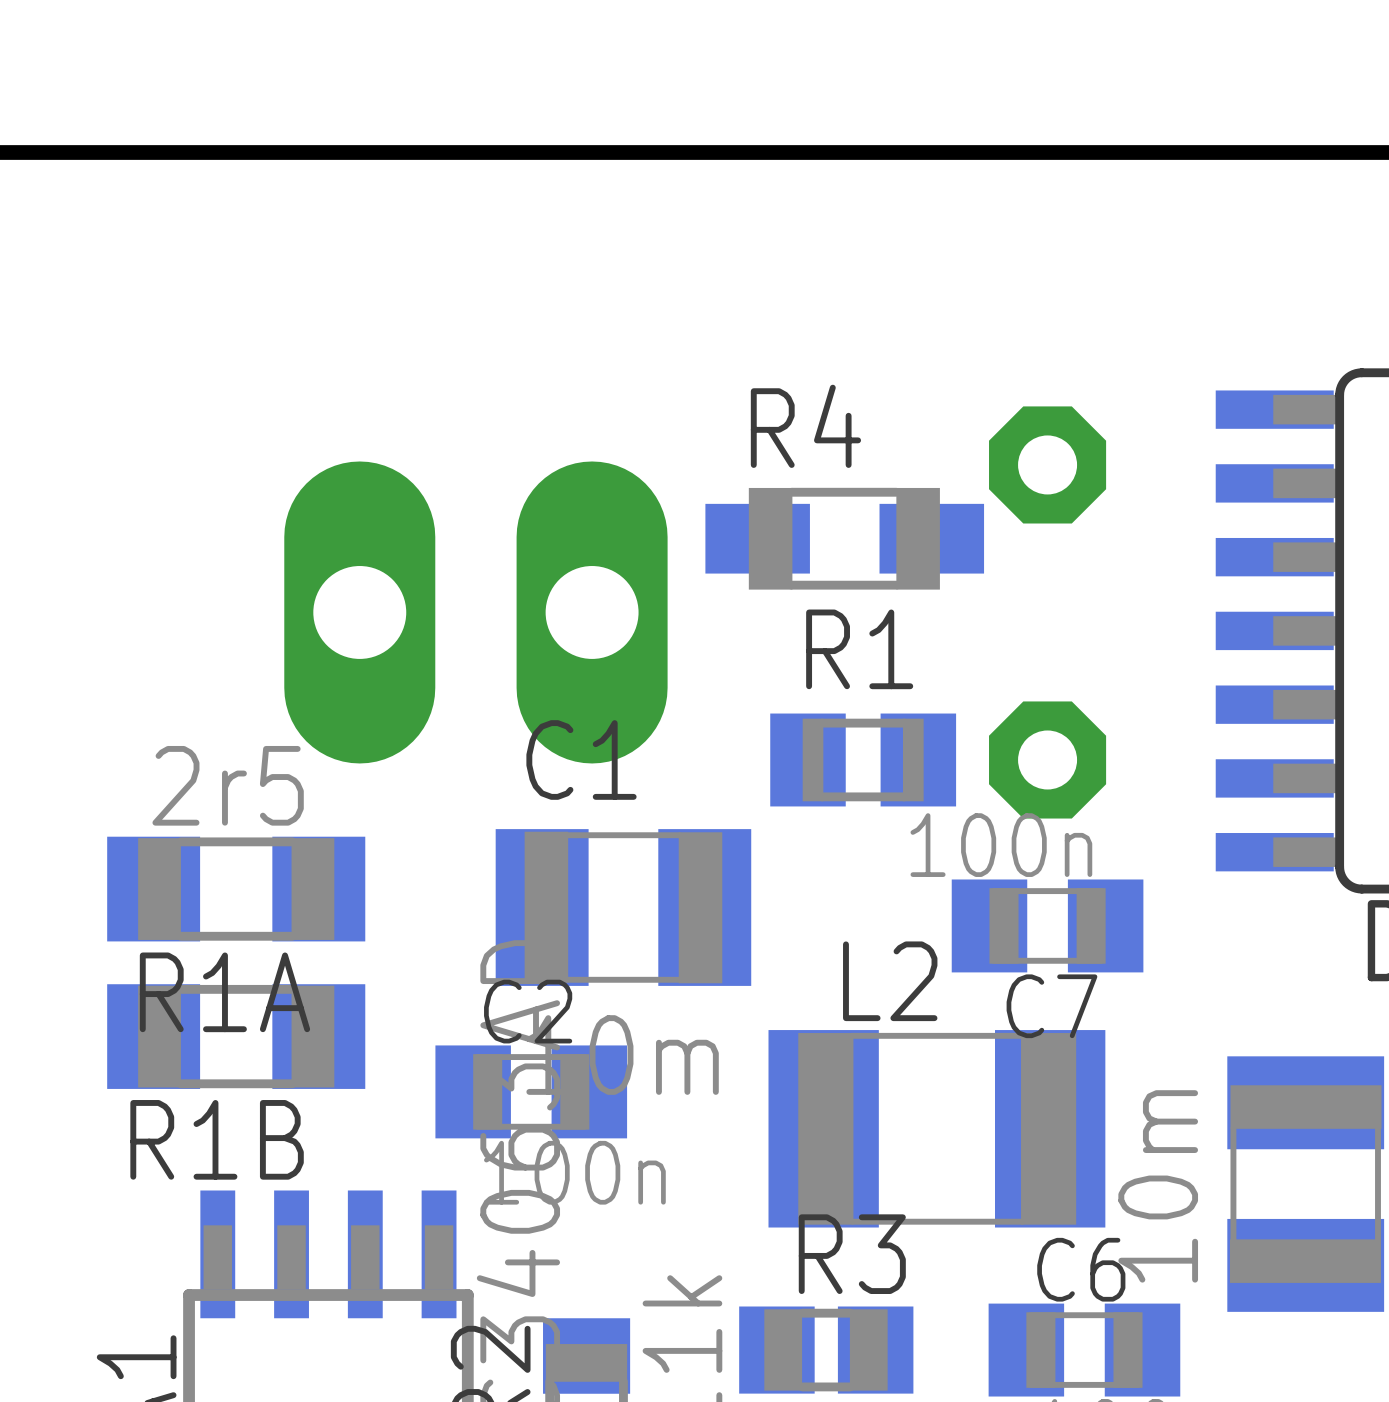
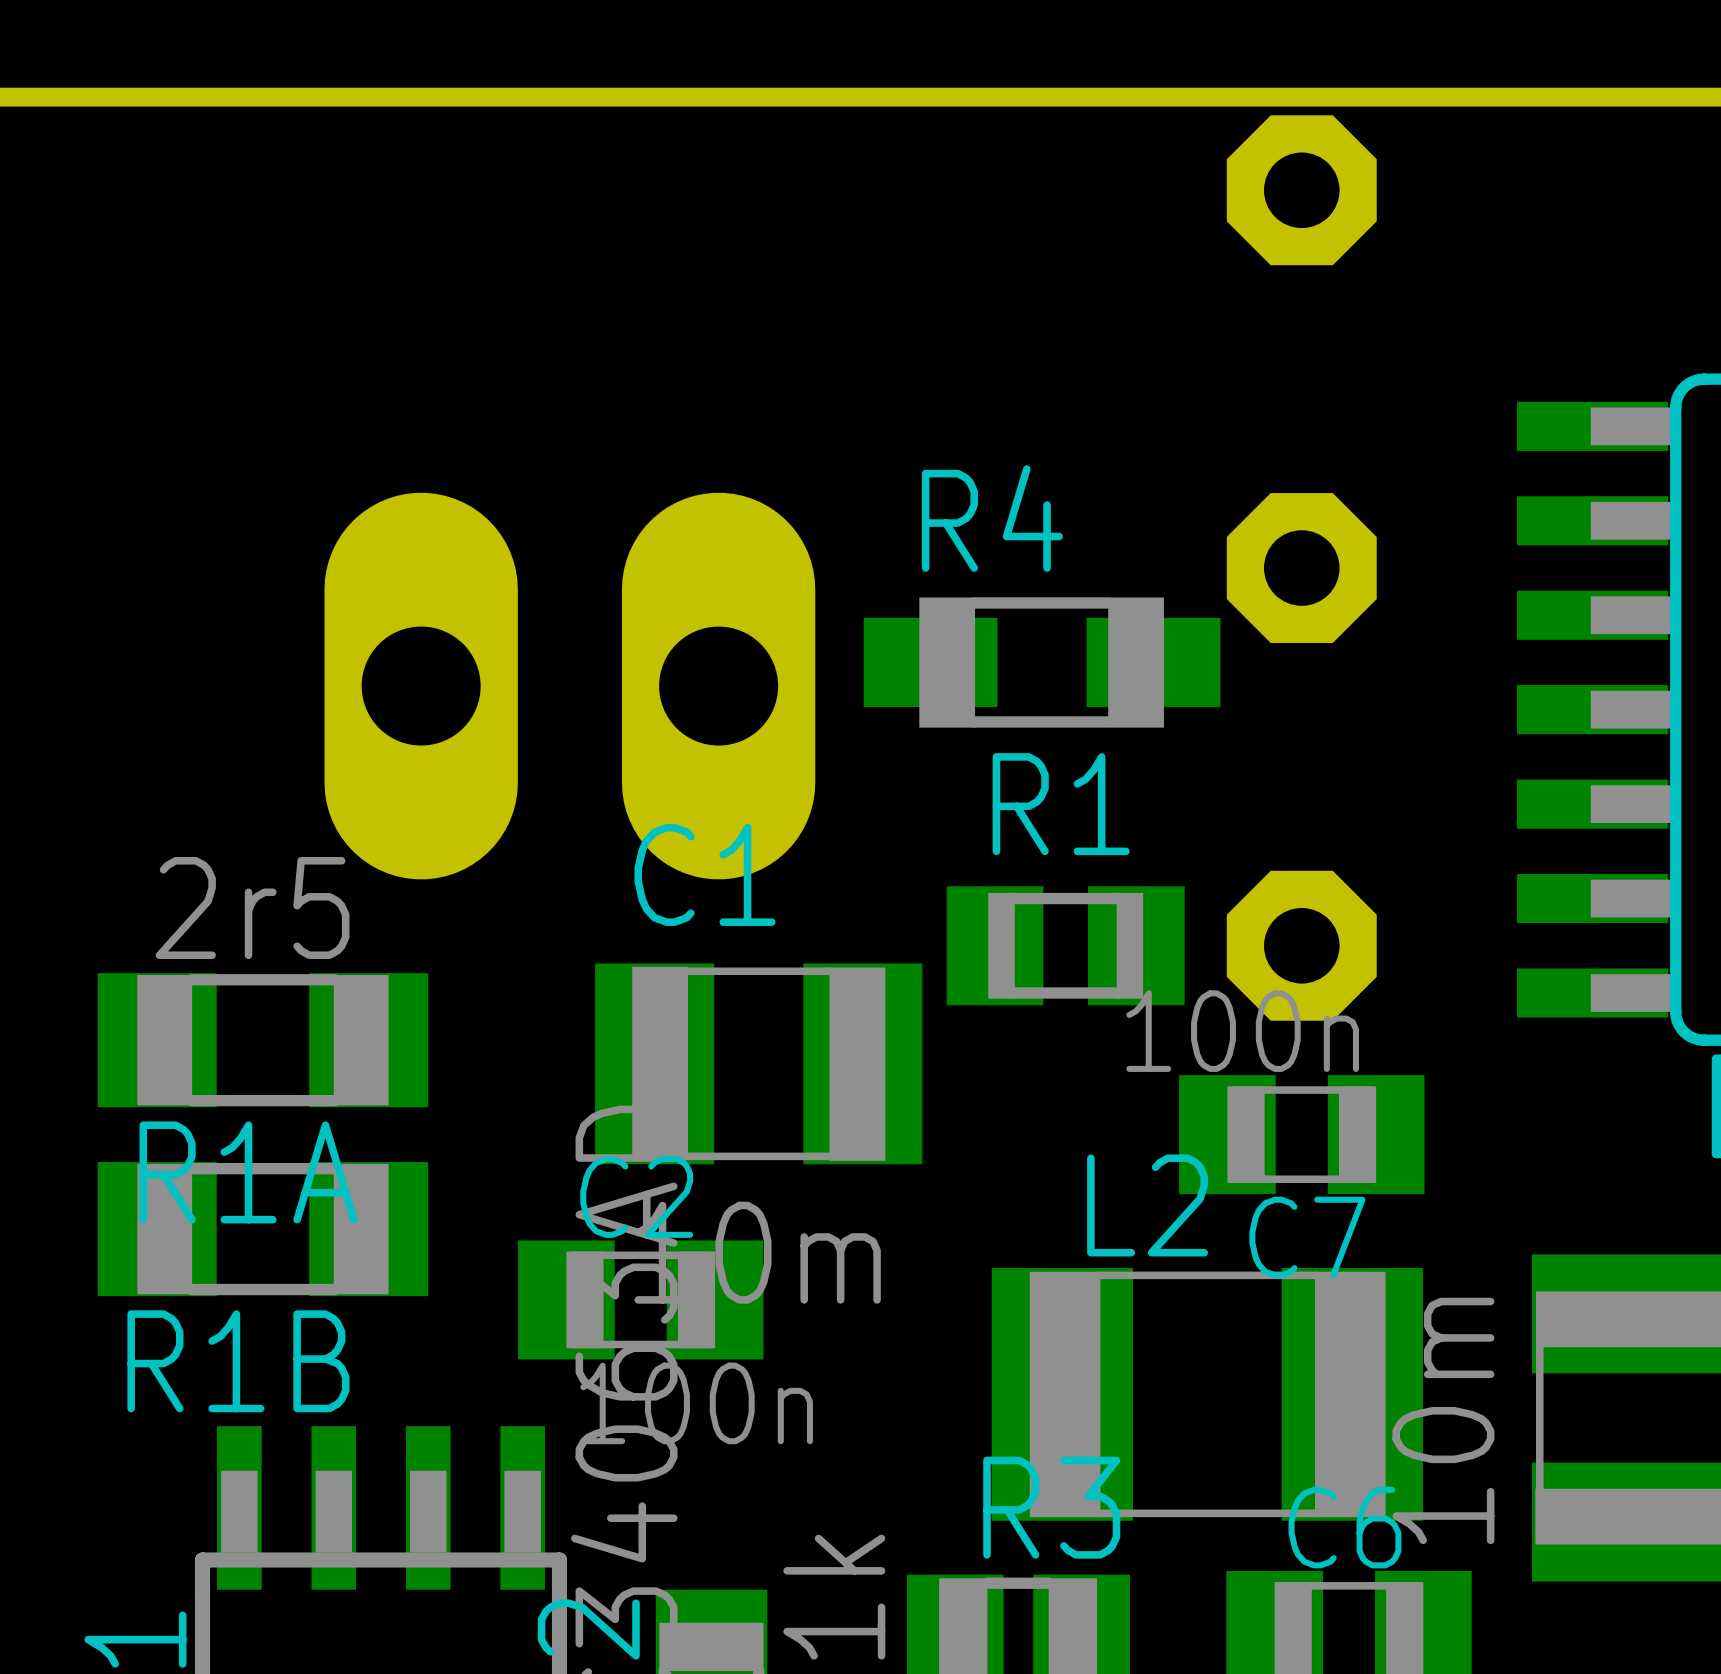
part: none -> (1301, 190)
part position: (1047, 464) -> (1301, 568)
R4 position: (844, 538) -> (1042, 662)
R1 position: (863, 759) -> (1065, 945)
part position: (1047, 759) -> (1301, 945)
C7 position: (1047, 925) -> (1301, 1134)
L2 position: (936, 1128) -> (1207, 1394)

